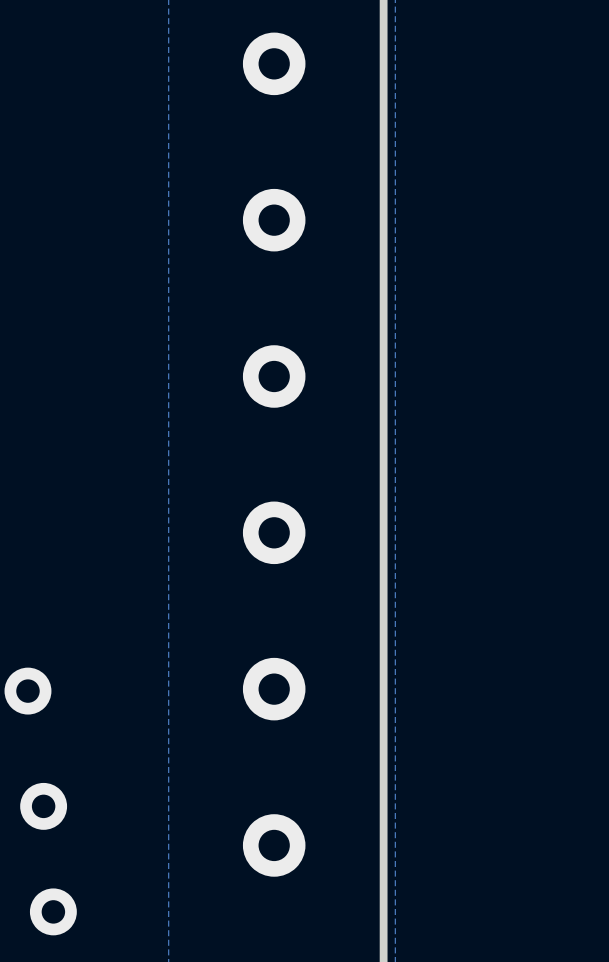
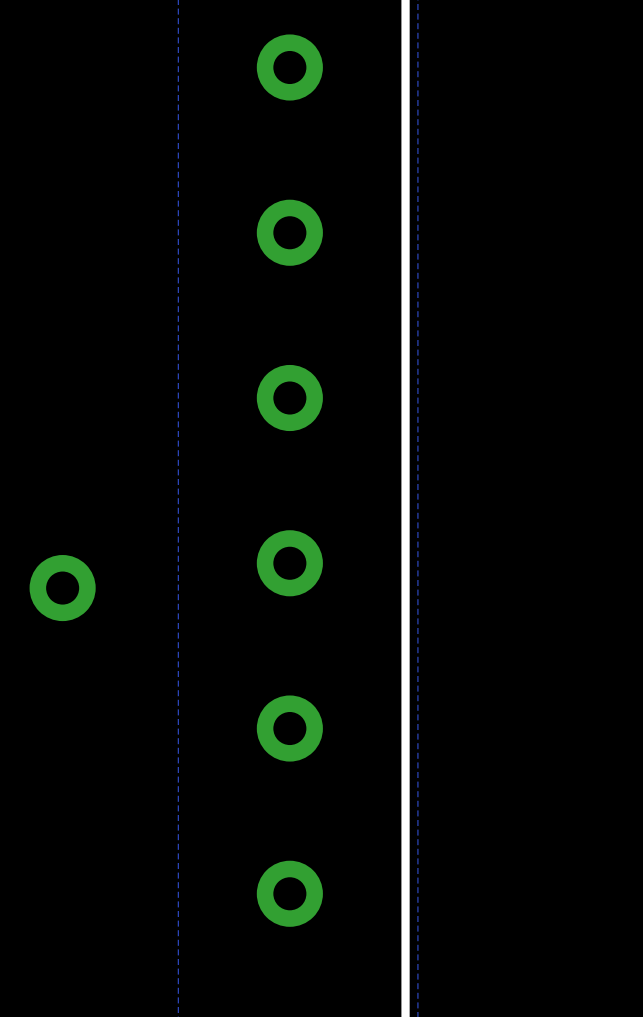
via: none -> (62, 588)
via: (27, 691) -> none
via: (43, 806) -> none
via: (53, 911) -> none

